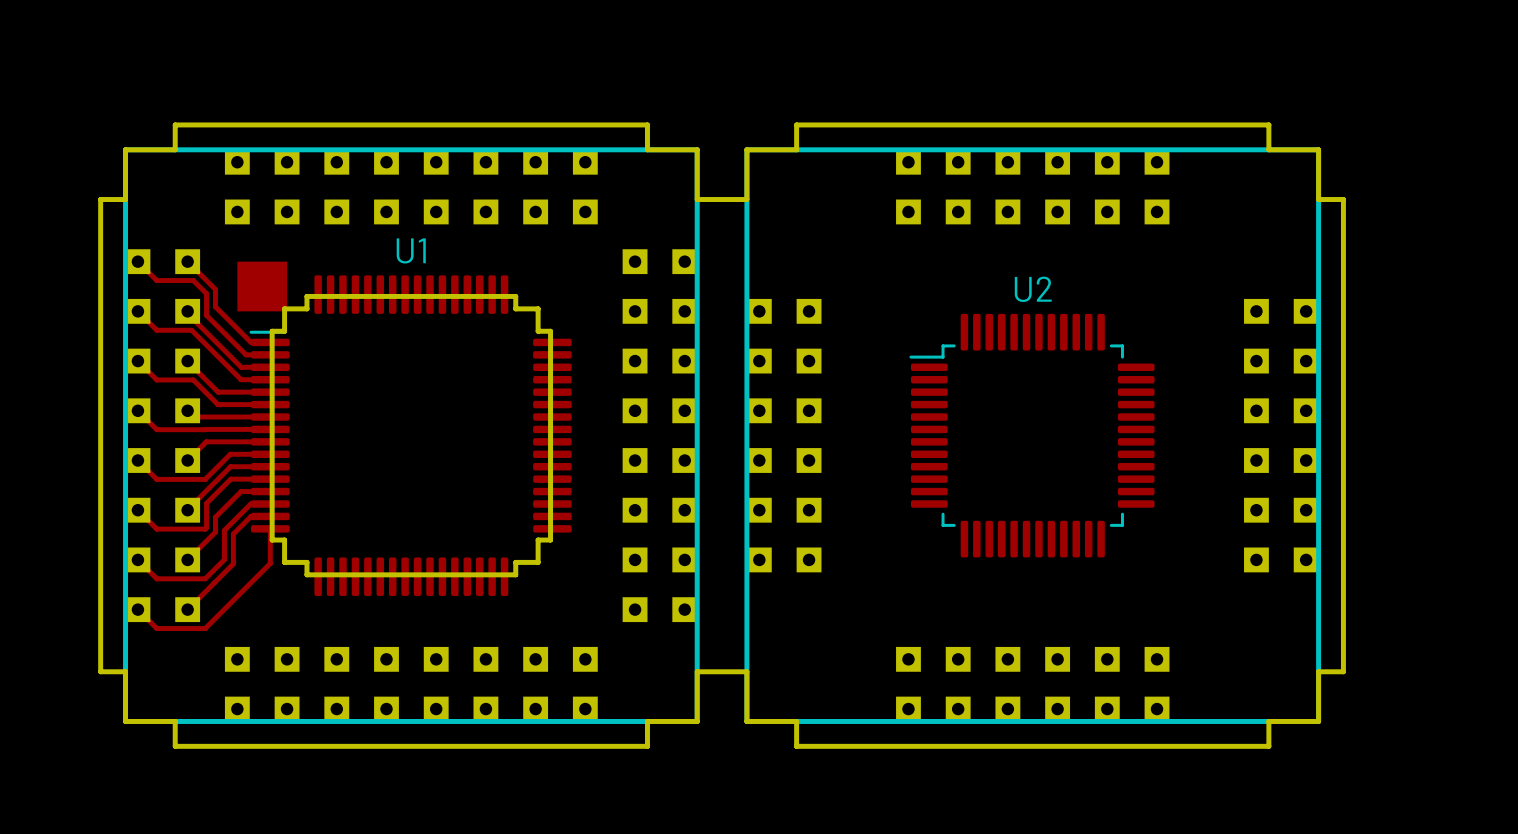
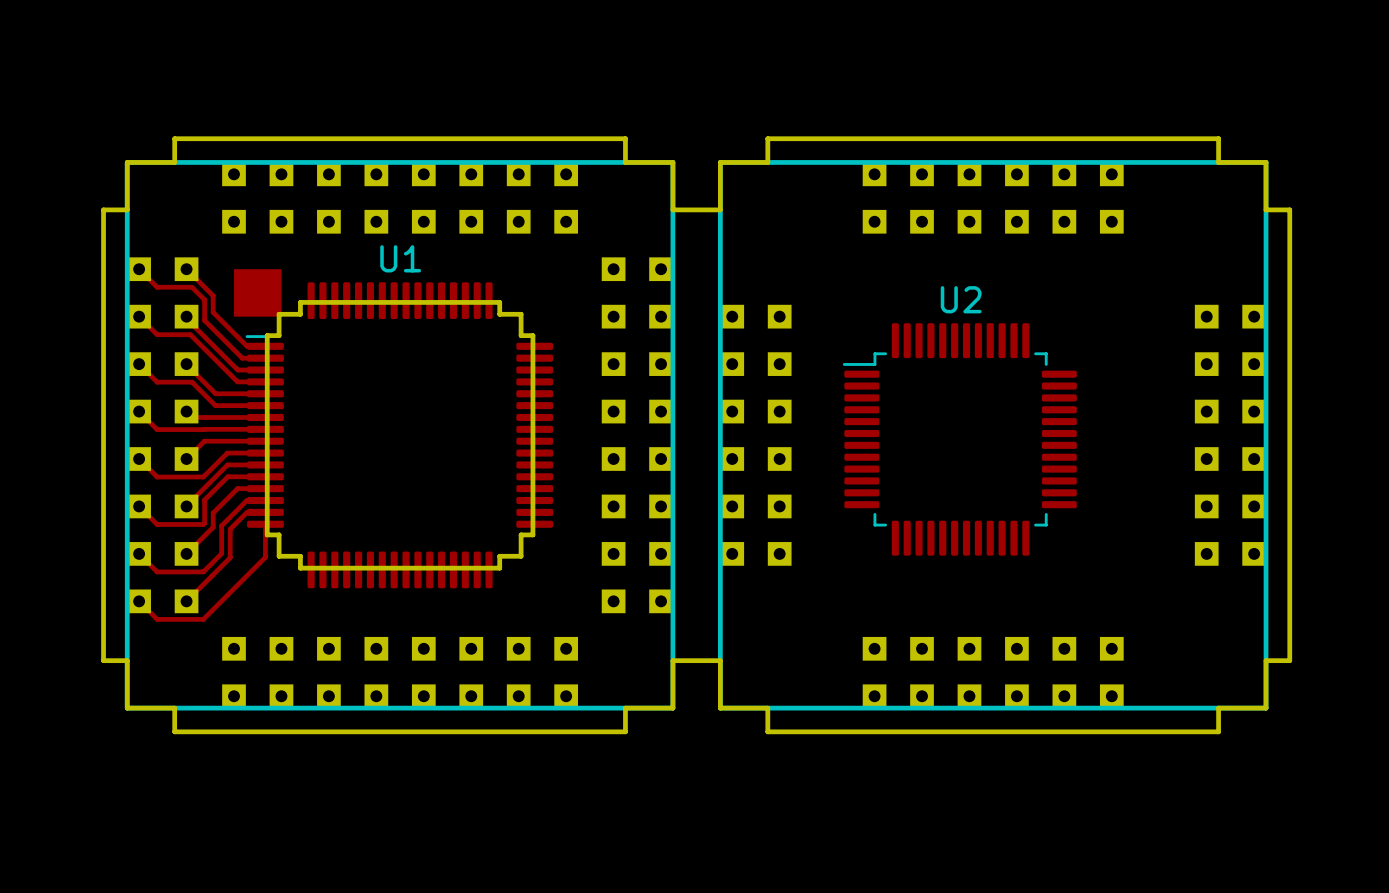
U2 position: (1032, 435) -> (959, 439)

